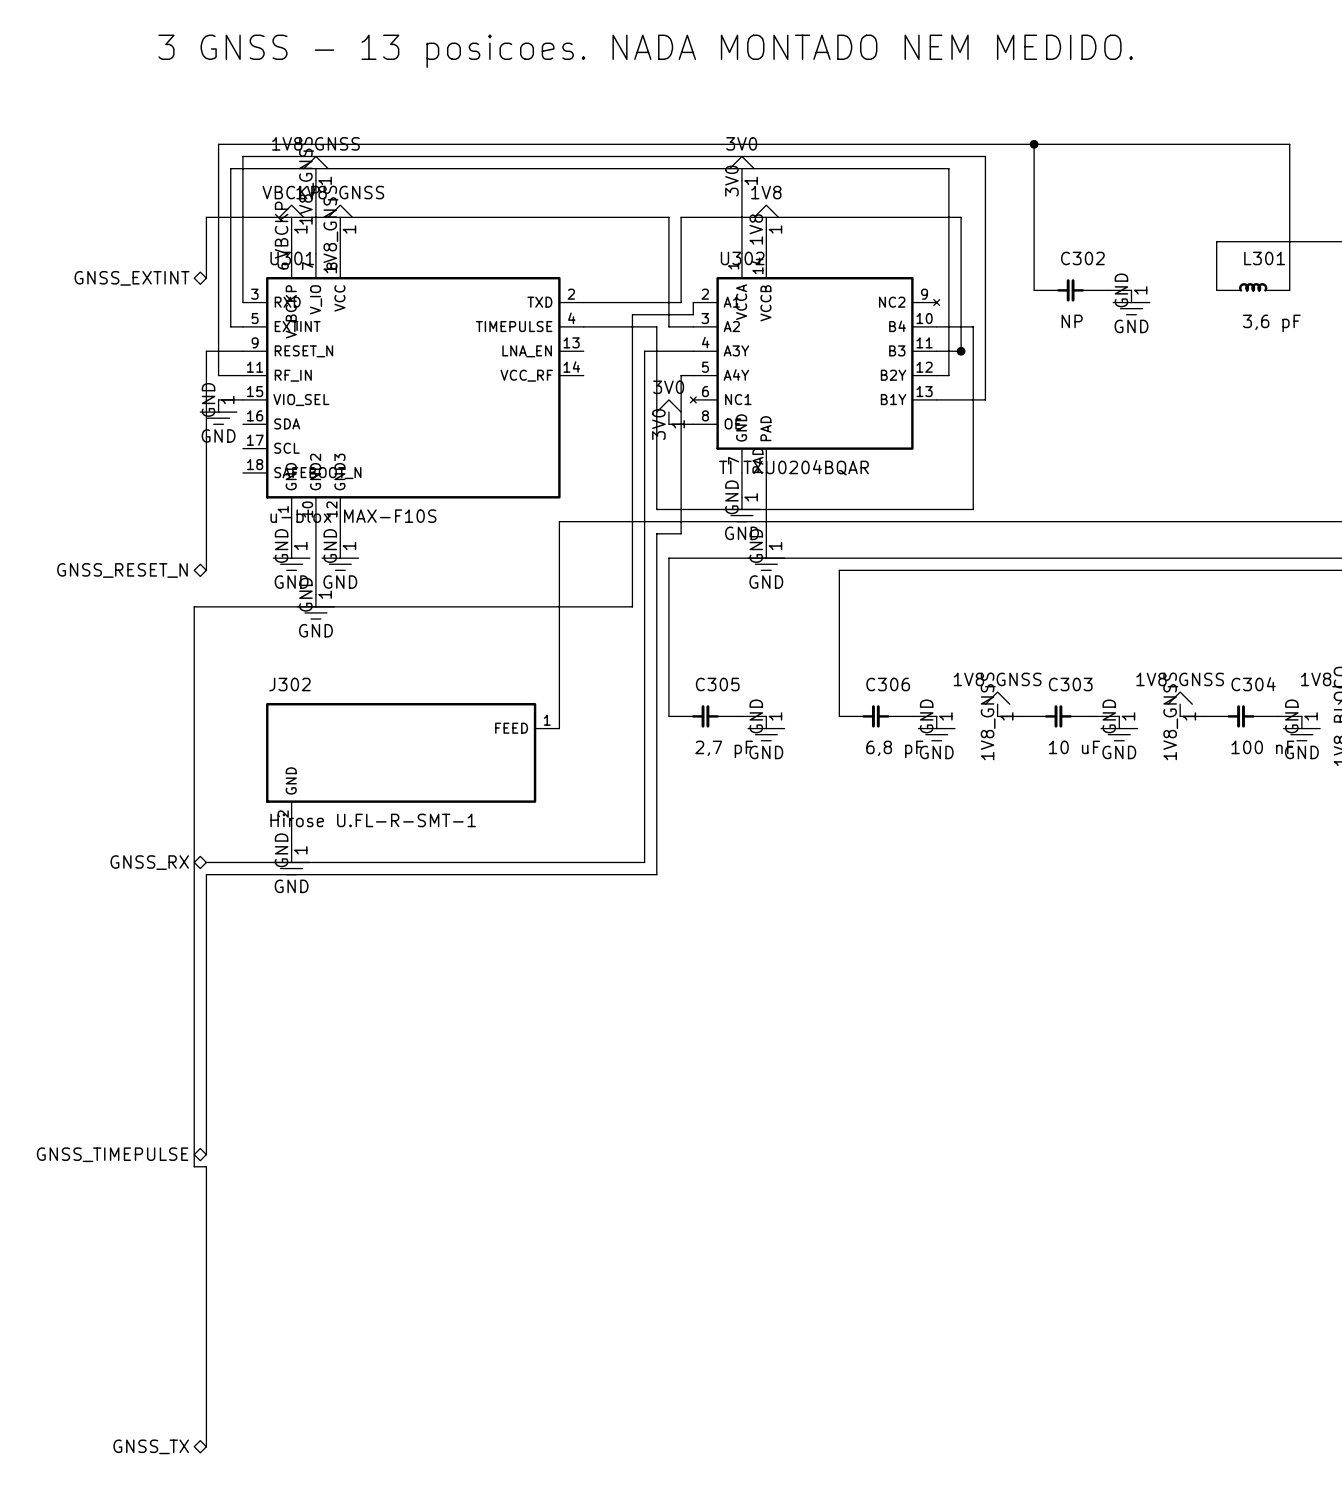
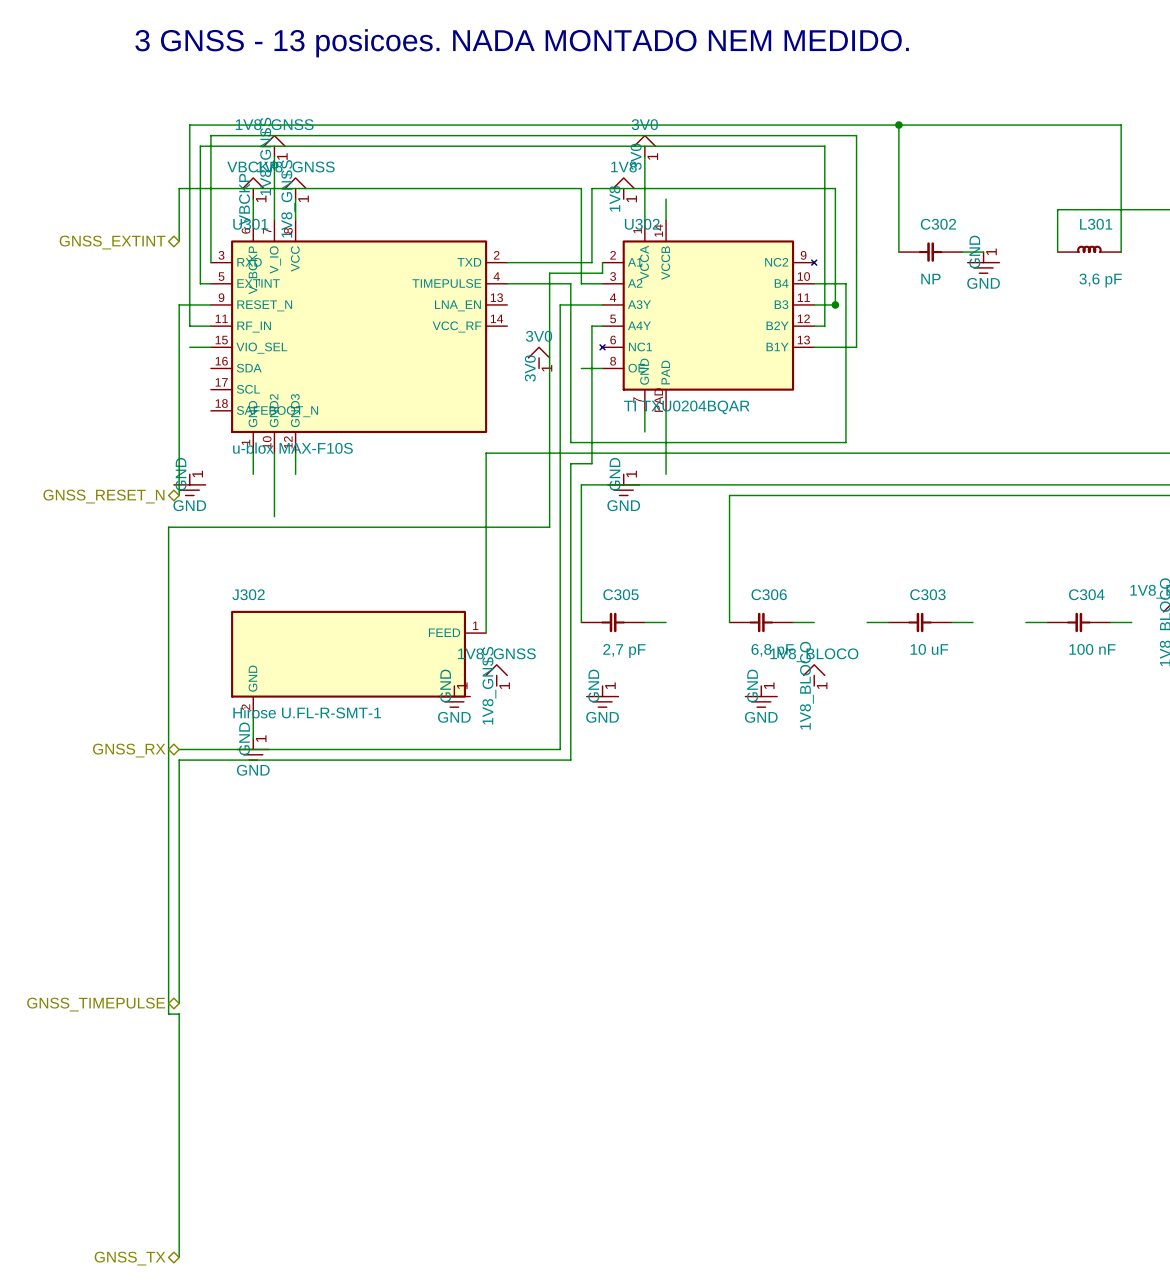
power symbol position: 1V8 (766, 217) -> 1V8 (623, 188)
power symbol: GND (218, 412) -> none
power symbol position: 3V0 (668, 412) -> 3V0 (539, 357)
power symbol: GND (741, 509) -> none
power symbol: none -> GND (189, 484)
power symbol: GND (291, 558) -> none
power symbol: GND (340, 558) -> none
power symbol: none -> GND (623, 484)
power symbol: GND (766, 558) -> none
power symbol: GND (315, 606) -> none
power symbol: 1V8_GNSS (997, 704) -> none
power symbol: 1V8_GNSS (1180, 704) -> none
power symbol: GND (766, 728) -> none
power symbol: GND (936, 728) -> none
power symbol: GND (1119, 728) -> none
power symbol: GND (1301, 728) -> none
power symbol: none -> 1V8_GNSS (496, 675)
power symbol: none -> 1V8_BLOCO (814, 675)
power symbol: none -> GND (454, 696)
power symbol: none -> GND (602, 696)
power symbol: none -> GND (761, 696)

